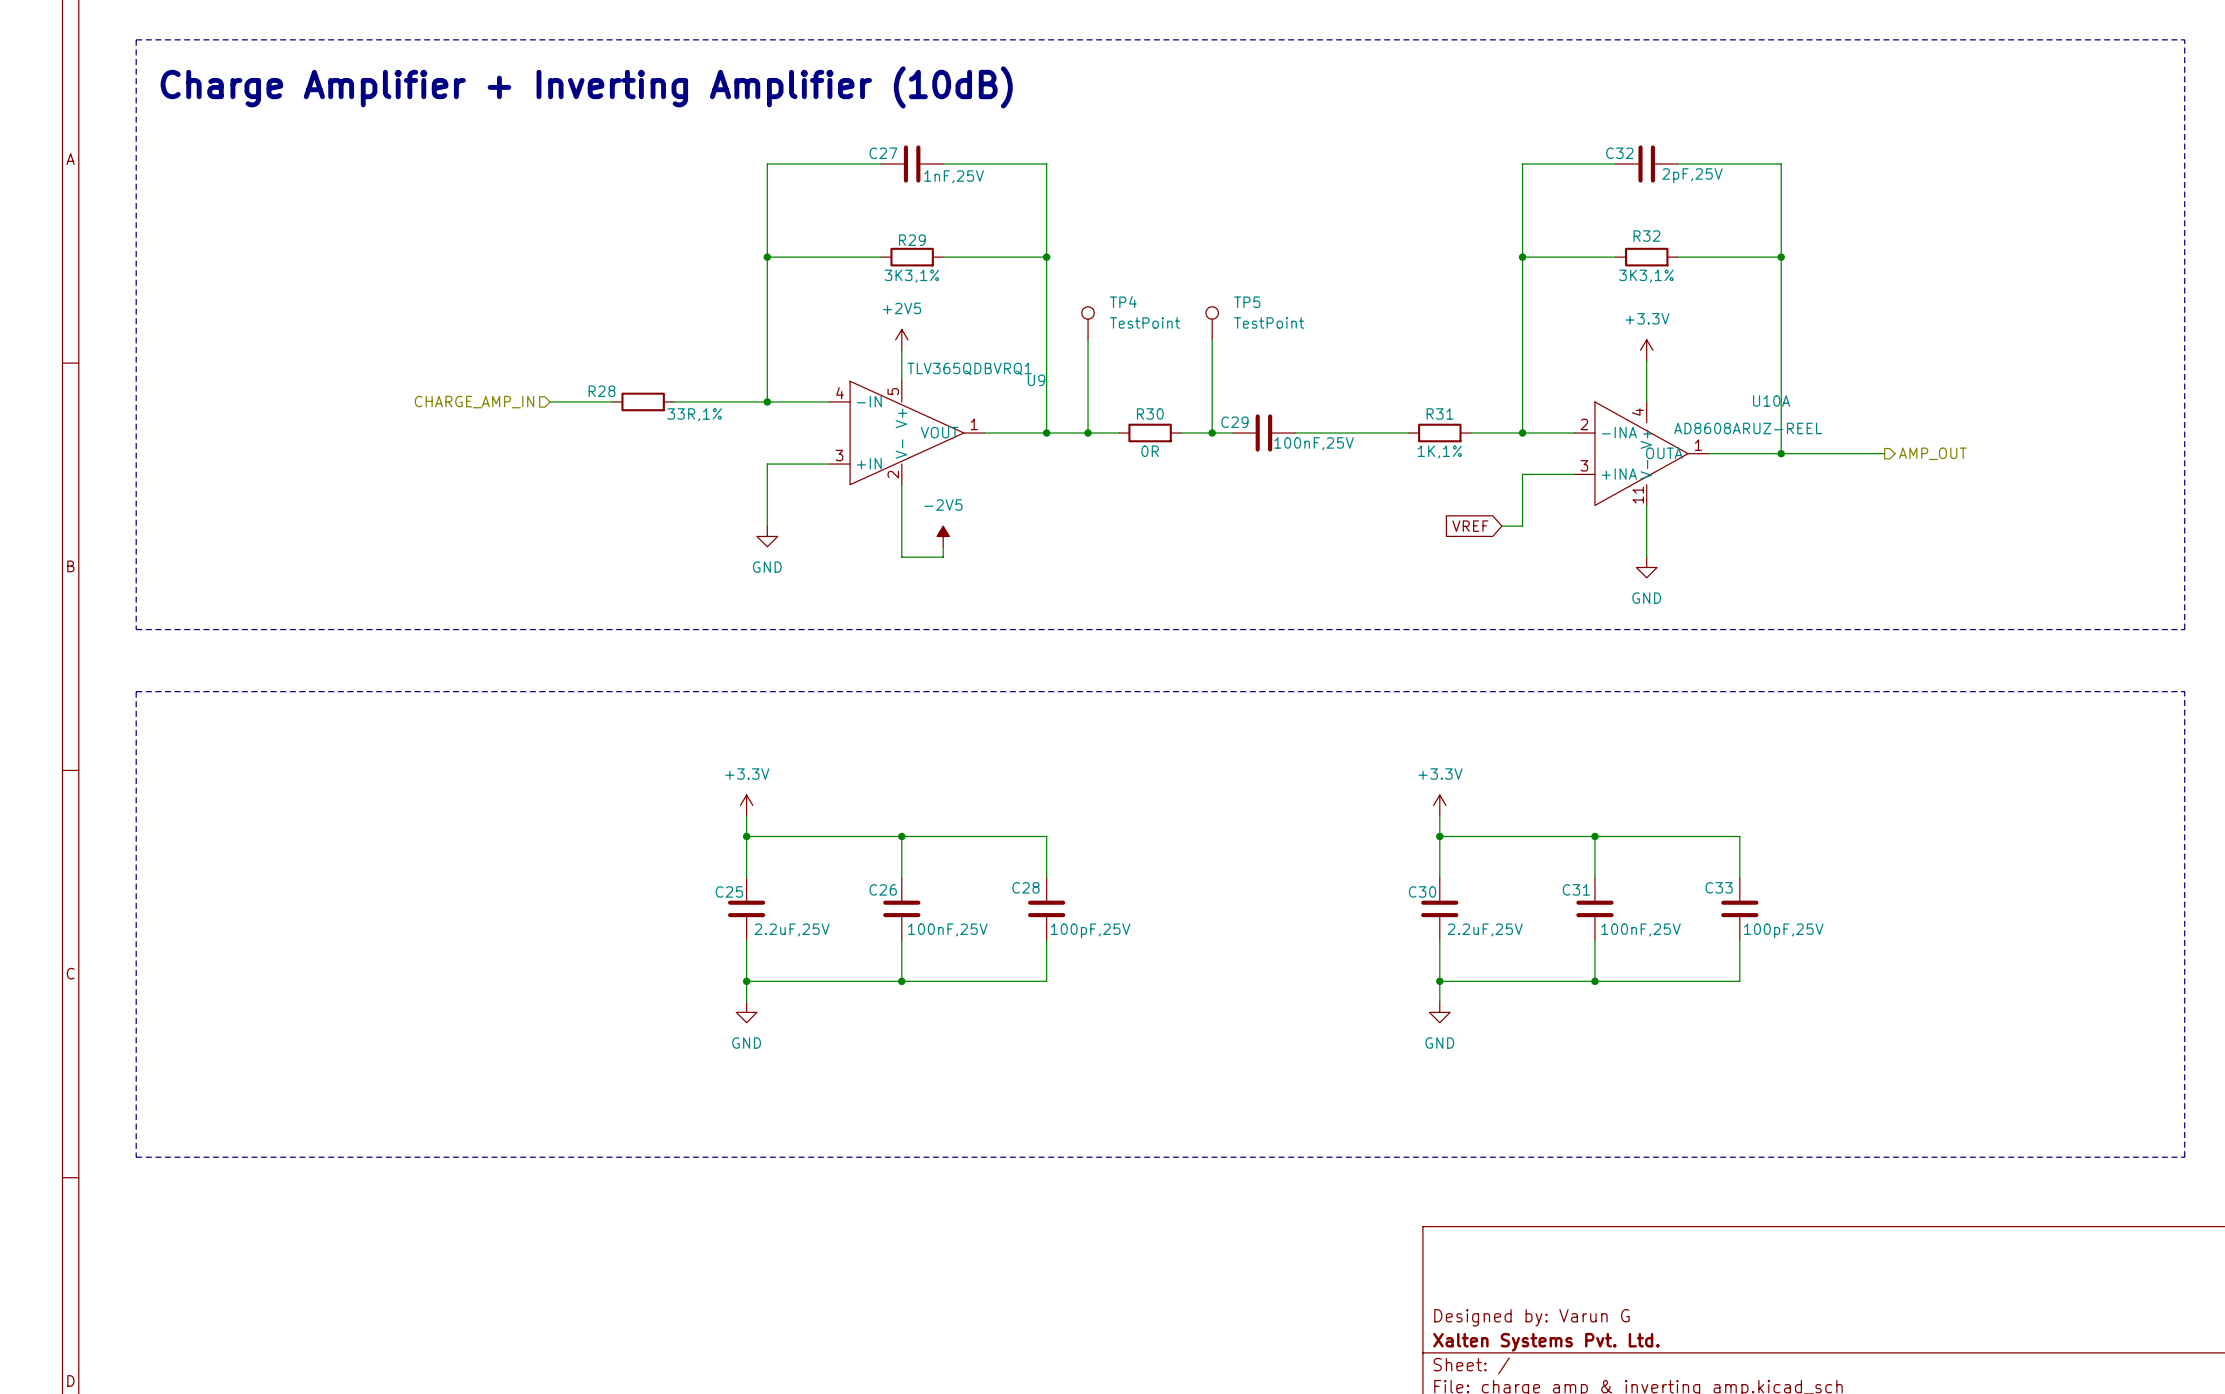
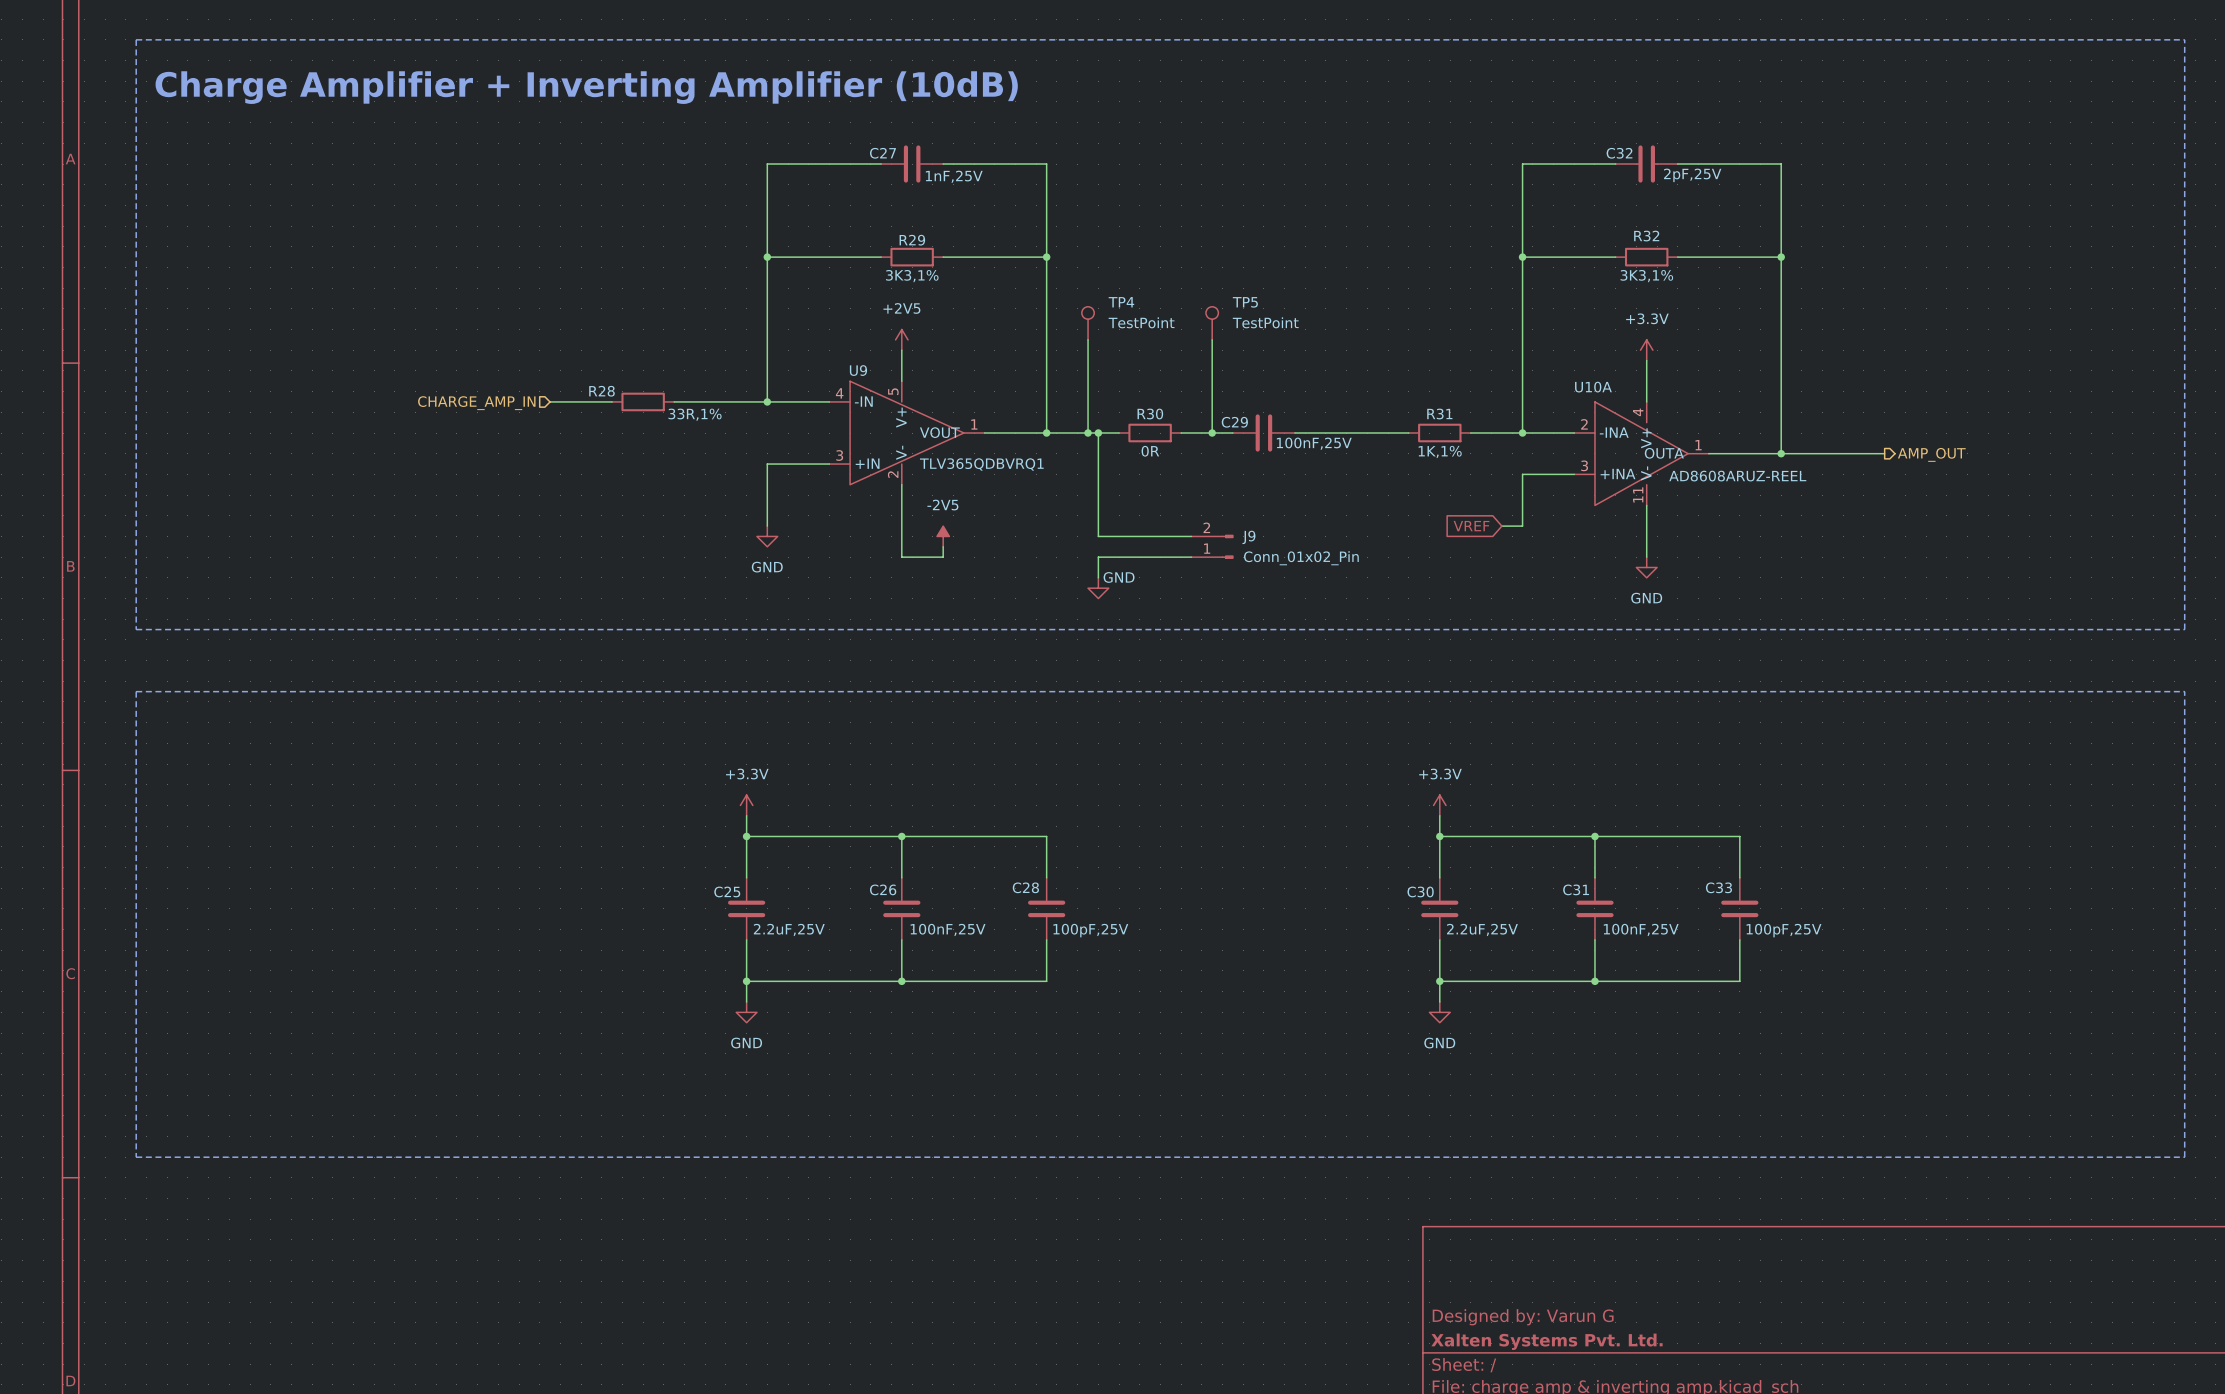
U9 value position: TLV365QDBVRQ1 (969, 368) -> TLV365QDBVRQ1 (981, 464)
U9 name position: U9 (1036, 380) -> U9 (858, 370)
U10A name position: U10A (1771, 401) -> U10A (1593, 387)
U10A value position: AD8608ARUZ-REEL (1748, 428) -> AD8608ARUZ-REEL (1737, 476)
wire: none -> (1098, 433) (1098, 536) (1191, 536)
junction: none -> (1098, 433)
J9: none -> Conn_01x02_Pin (1212, 546)
wire: none -> (1191, 557) (1098, 557) (1098, 577)
power symbol: none -> GND (1098, 588)

